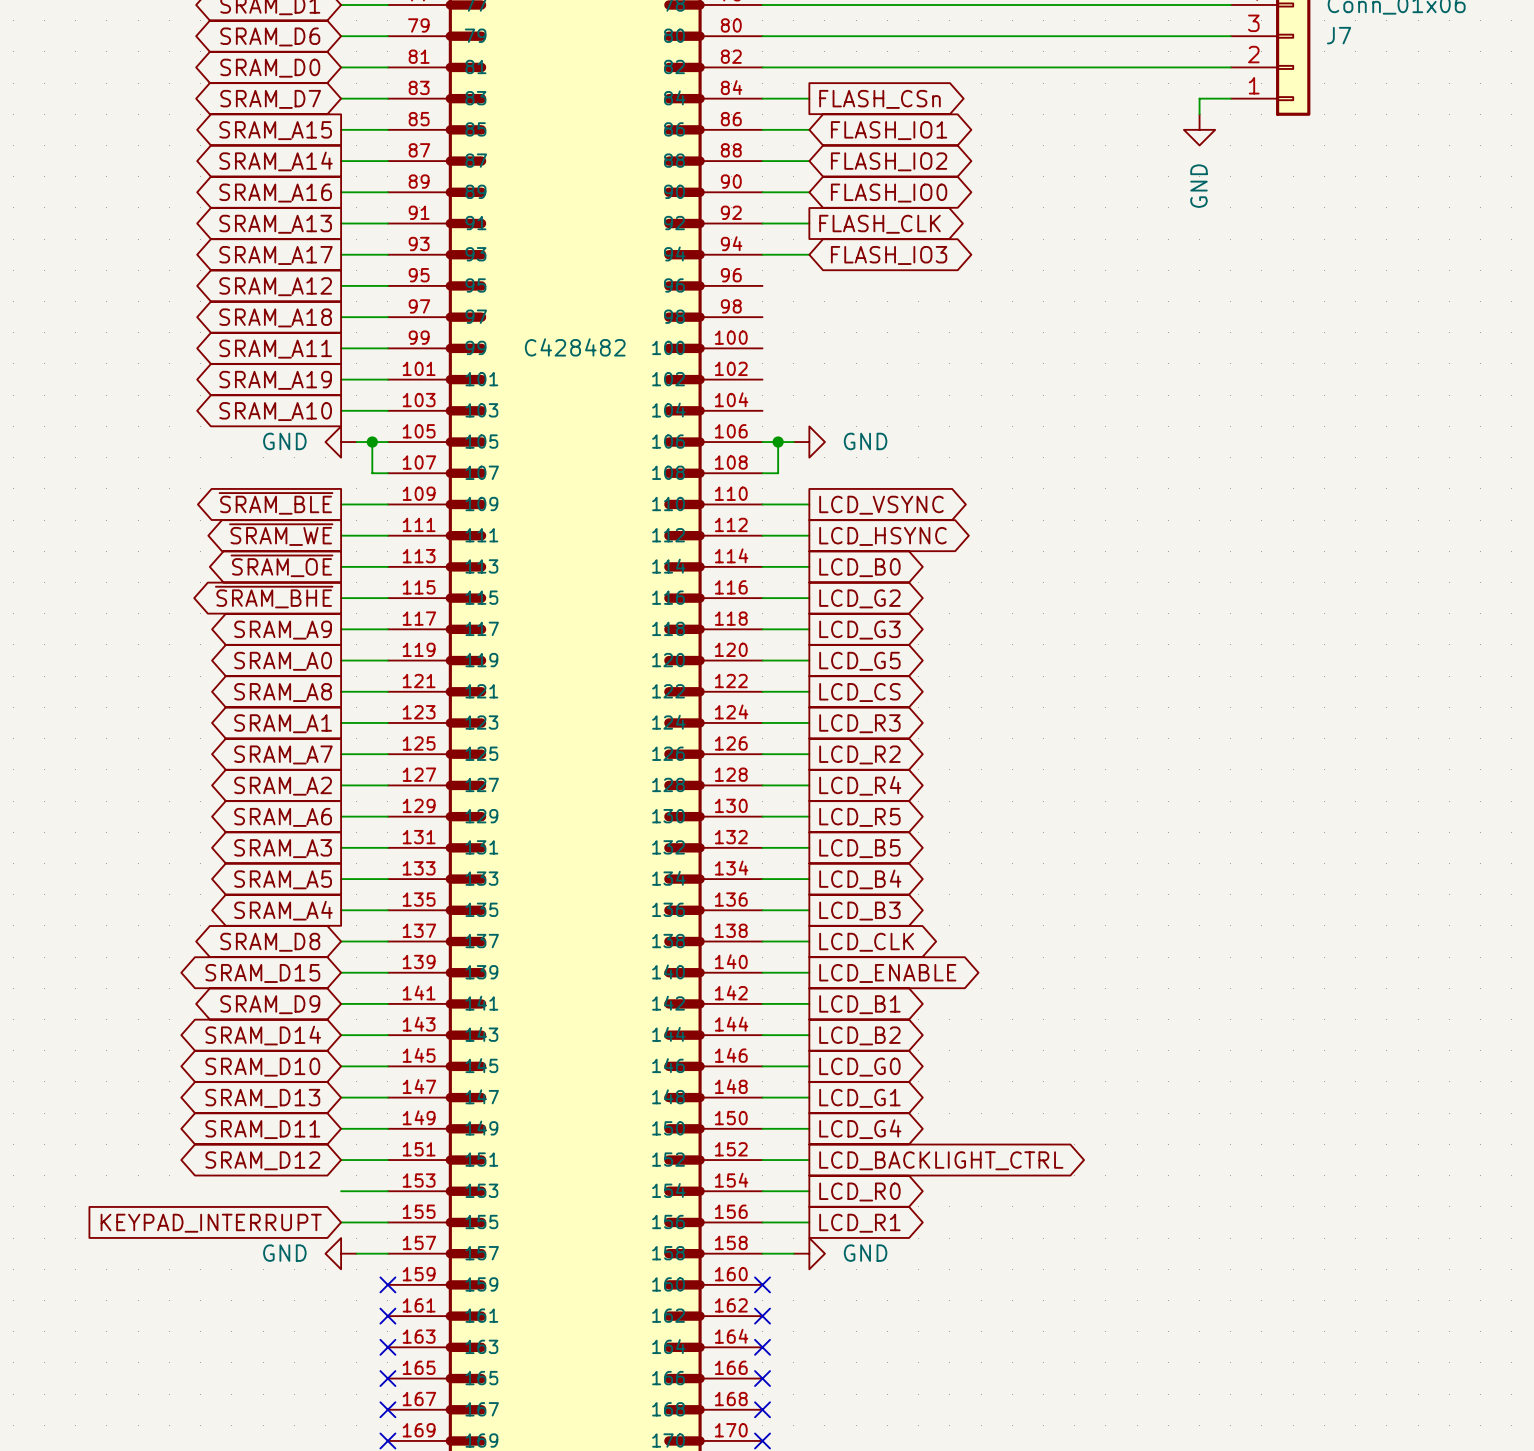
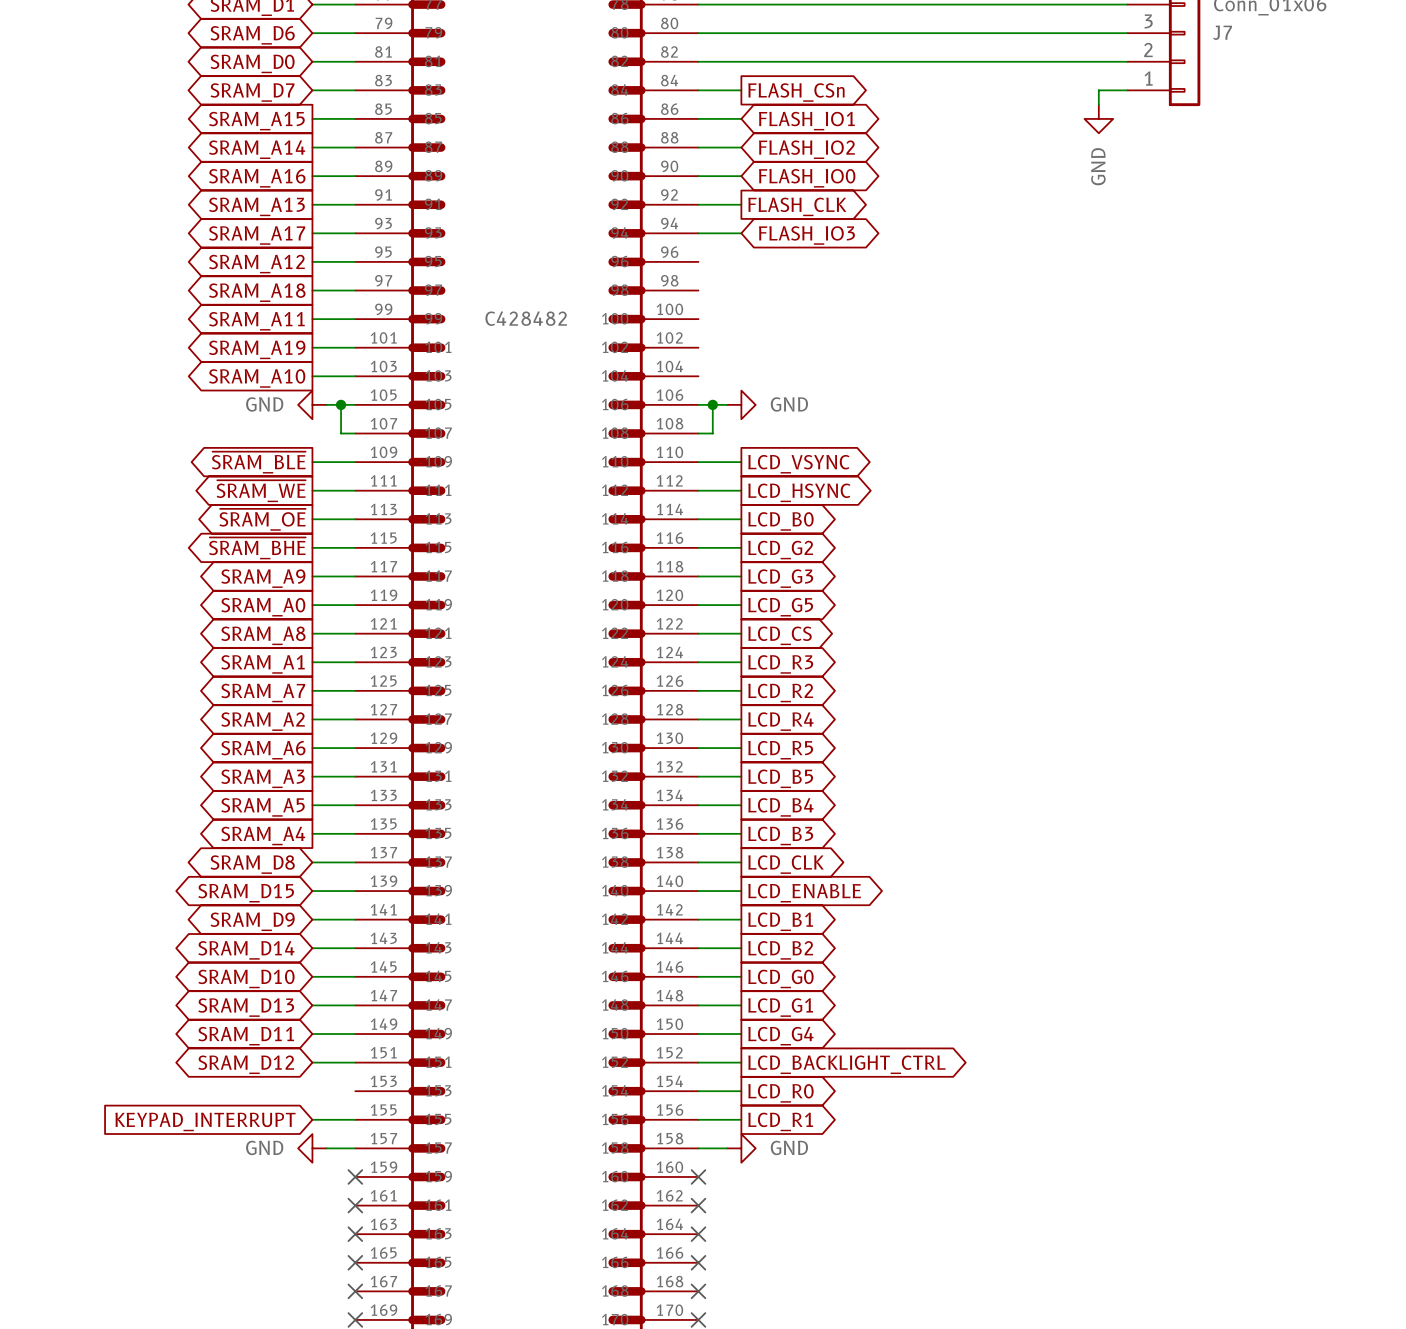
wire: (341, 1191) (387, 1191) -> none

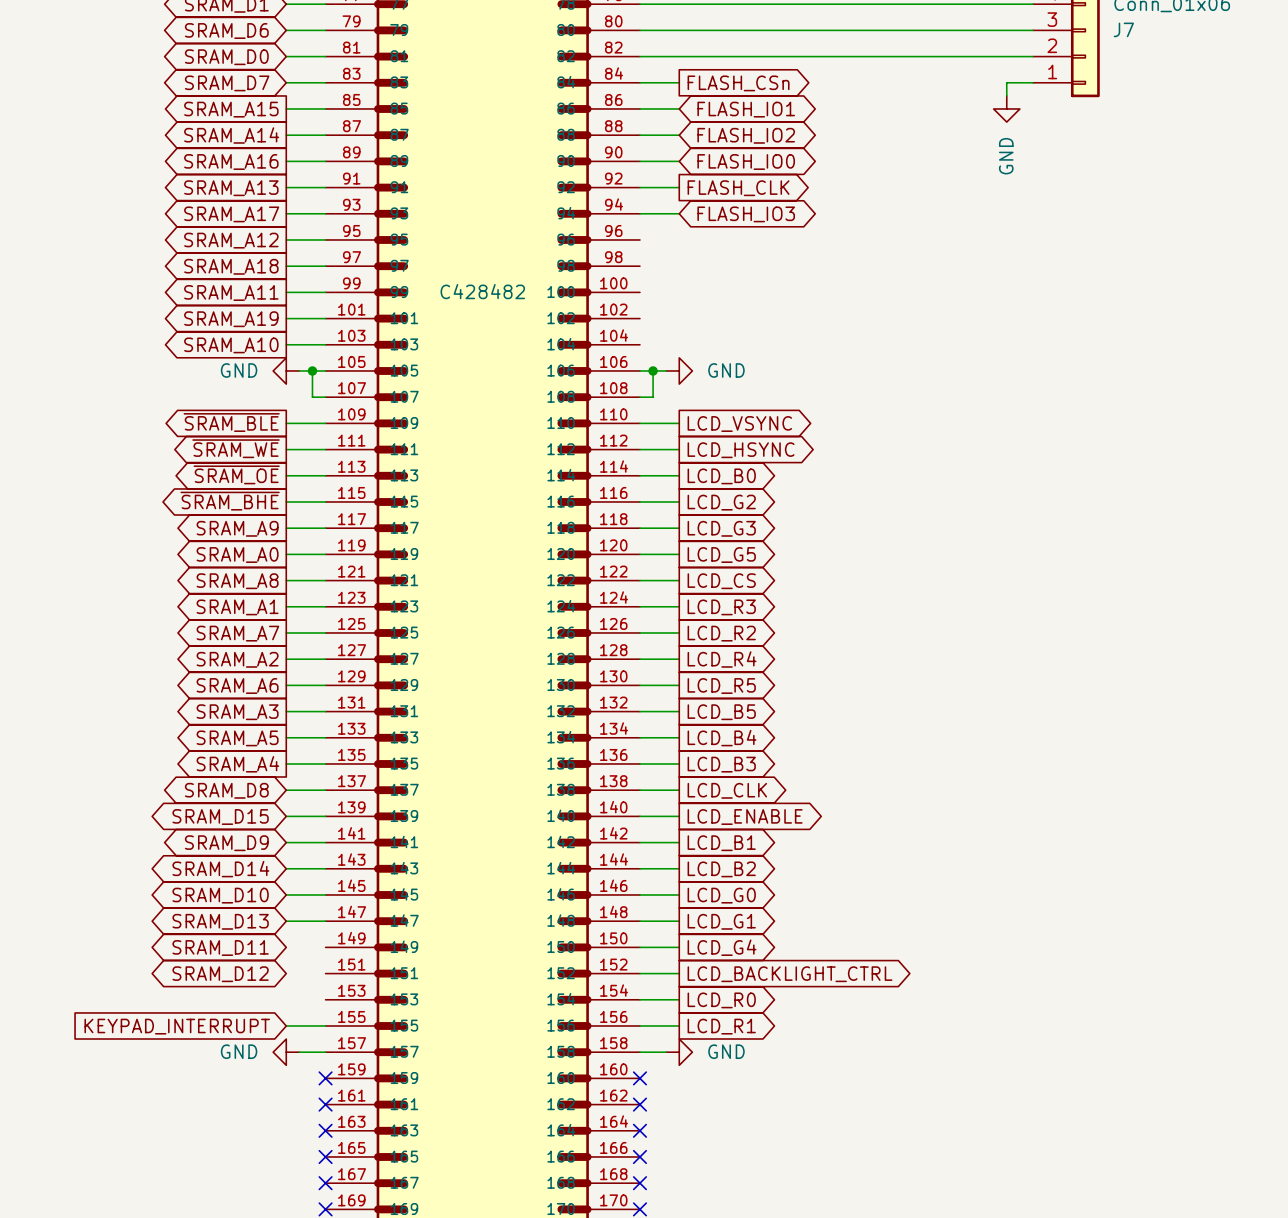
wire: (312, 1034) (355, 1034) -> none
wire: (312, 1062) (355, 1062) -> none

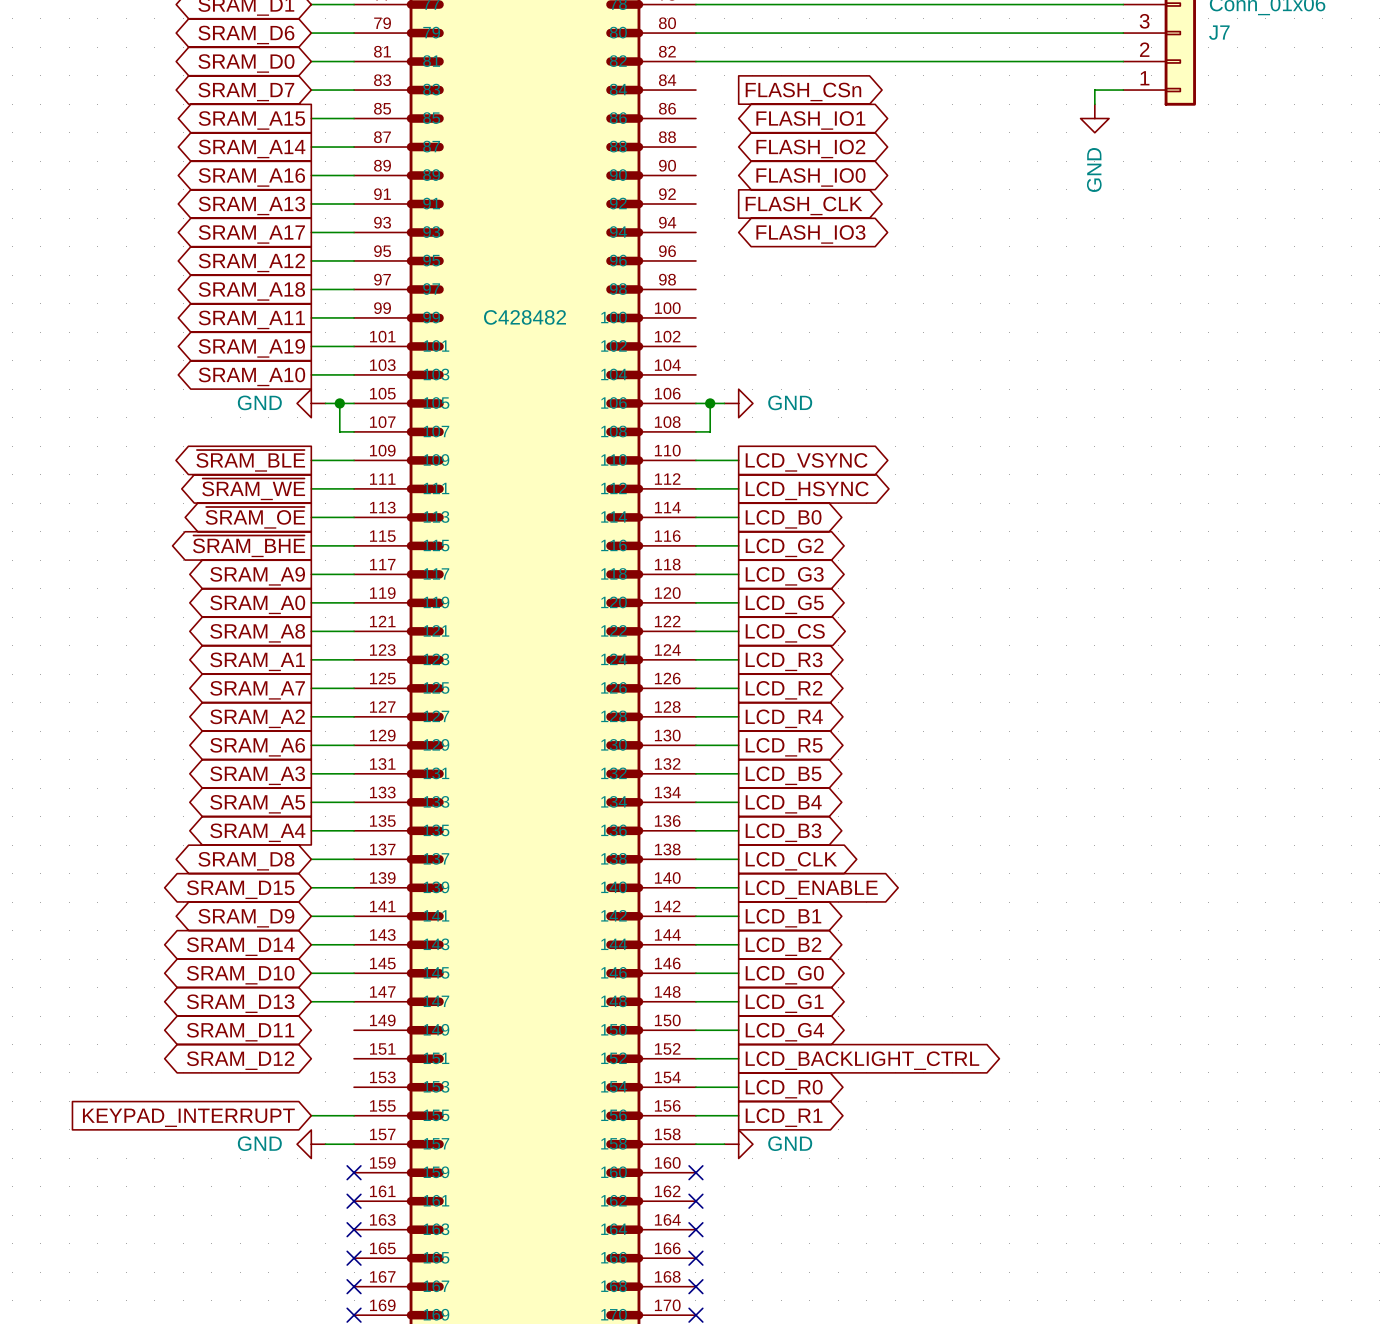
wire: (639, 82) (679, 82) -> none
wire: (639, 108) (679, 108) -> none
wire: (639, 135) (679, 135) -> none
wire: (639, 161) (679, 161) -> none
wire: (639, 187) (679, 187) -> none
wire: (639, 213) (679, 213) -> none

